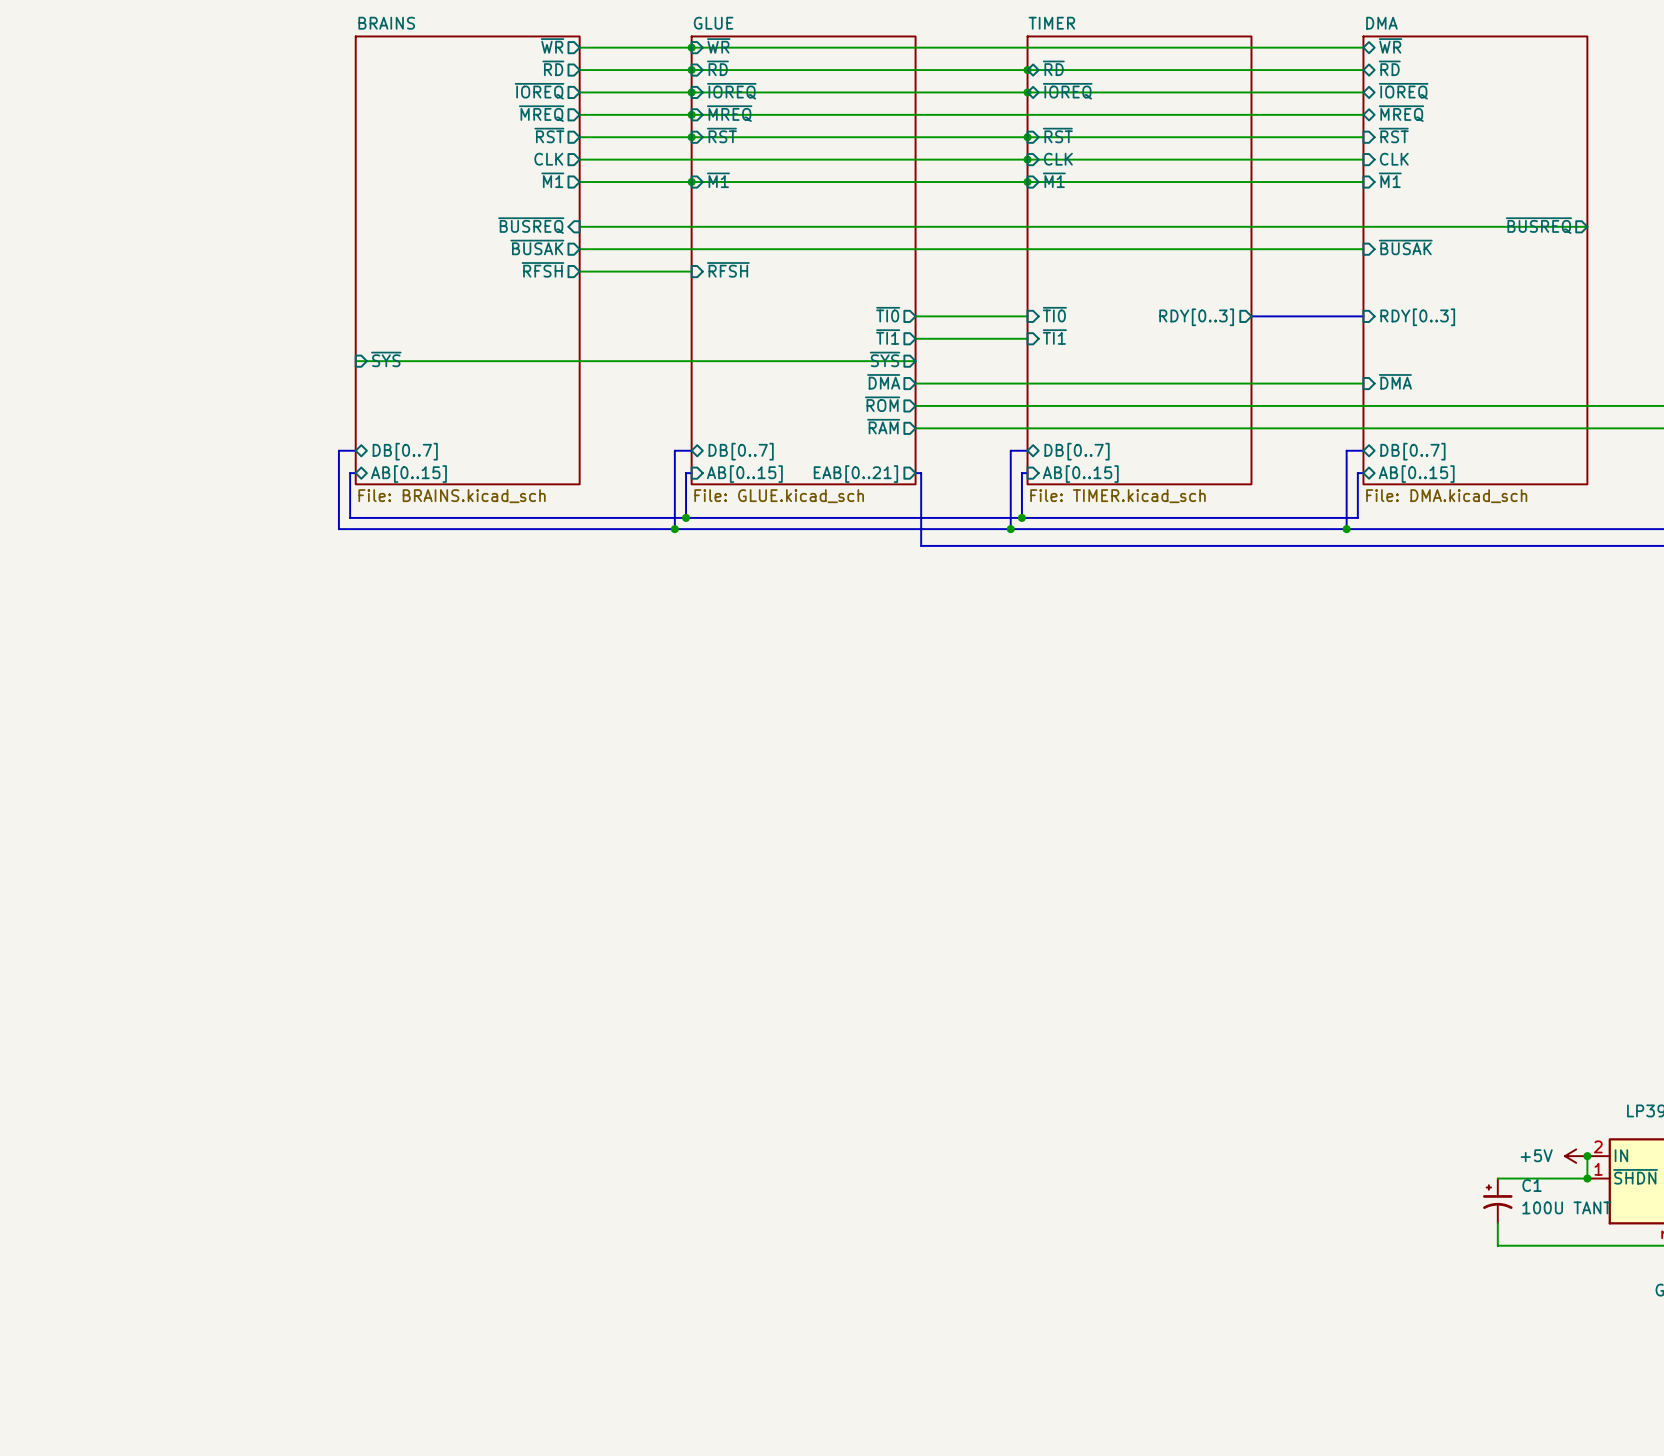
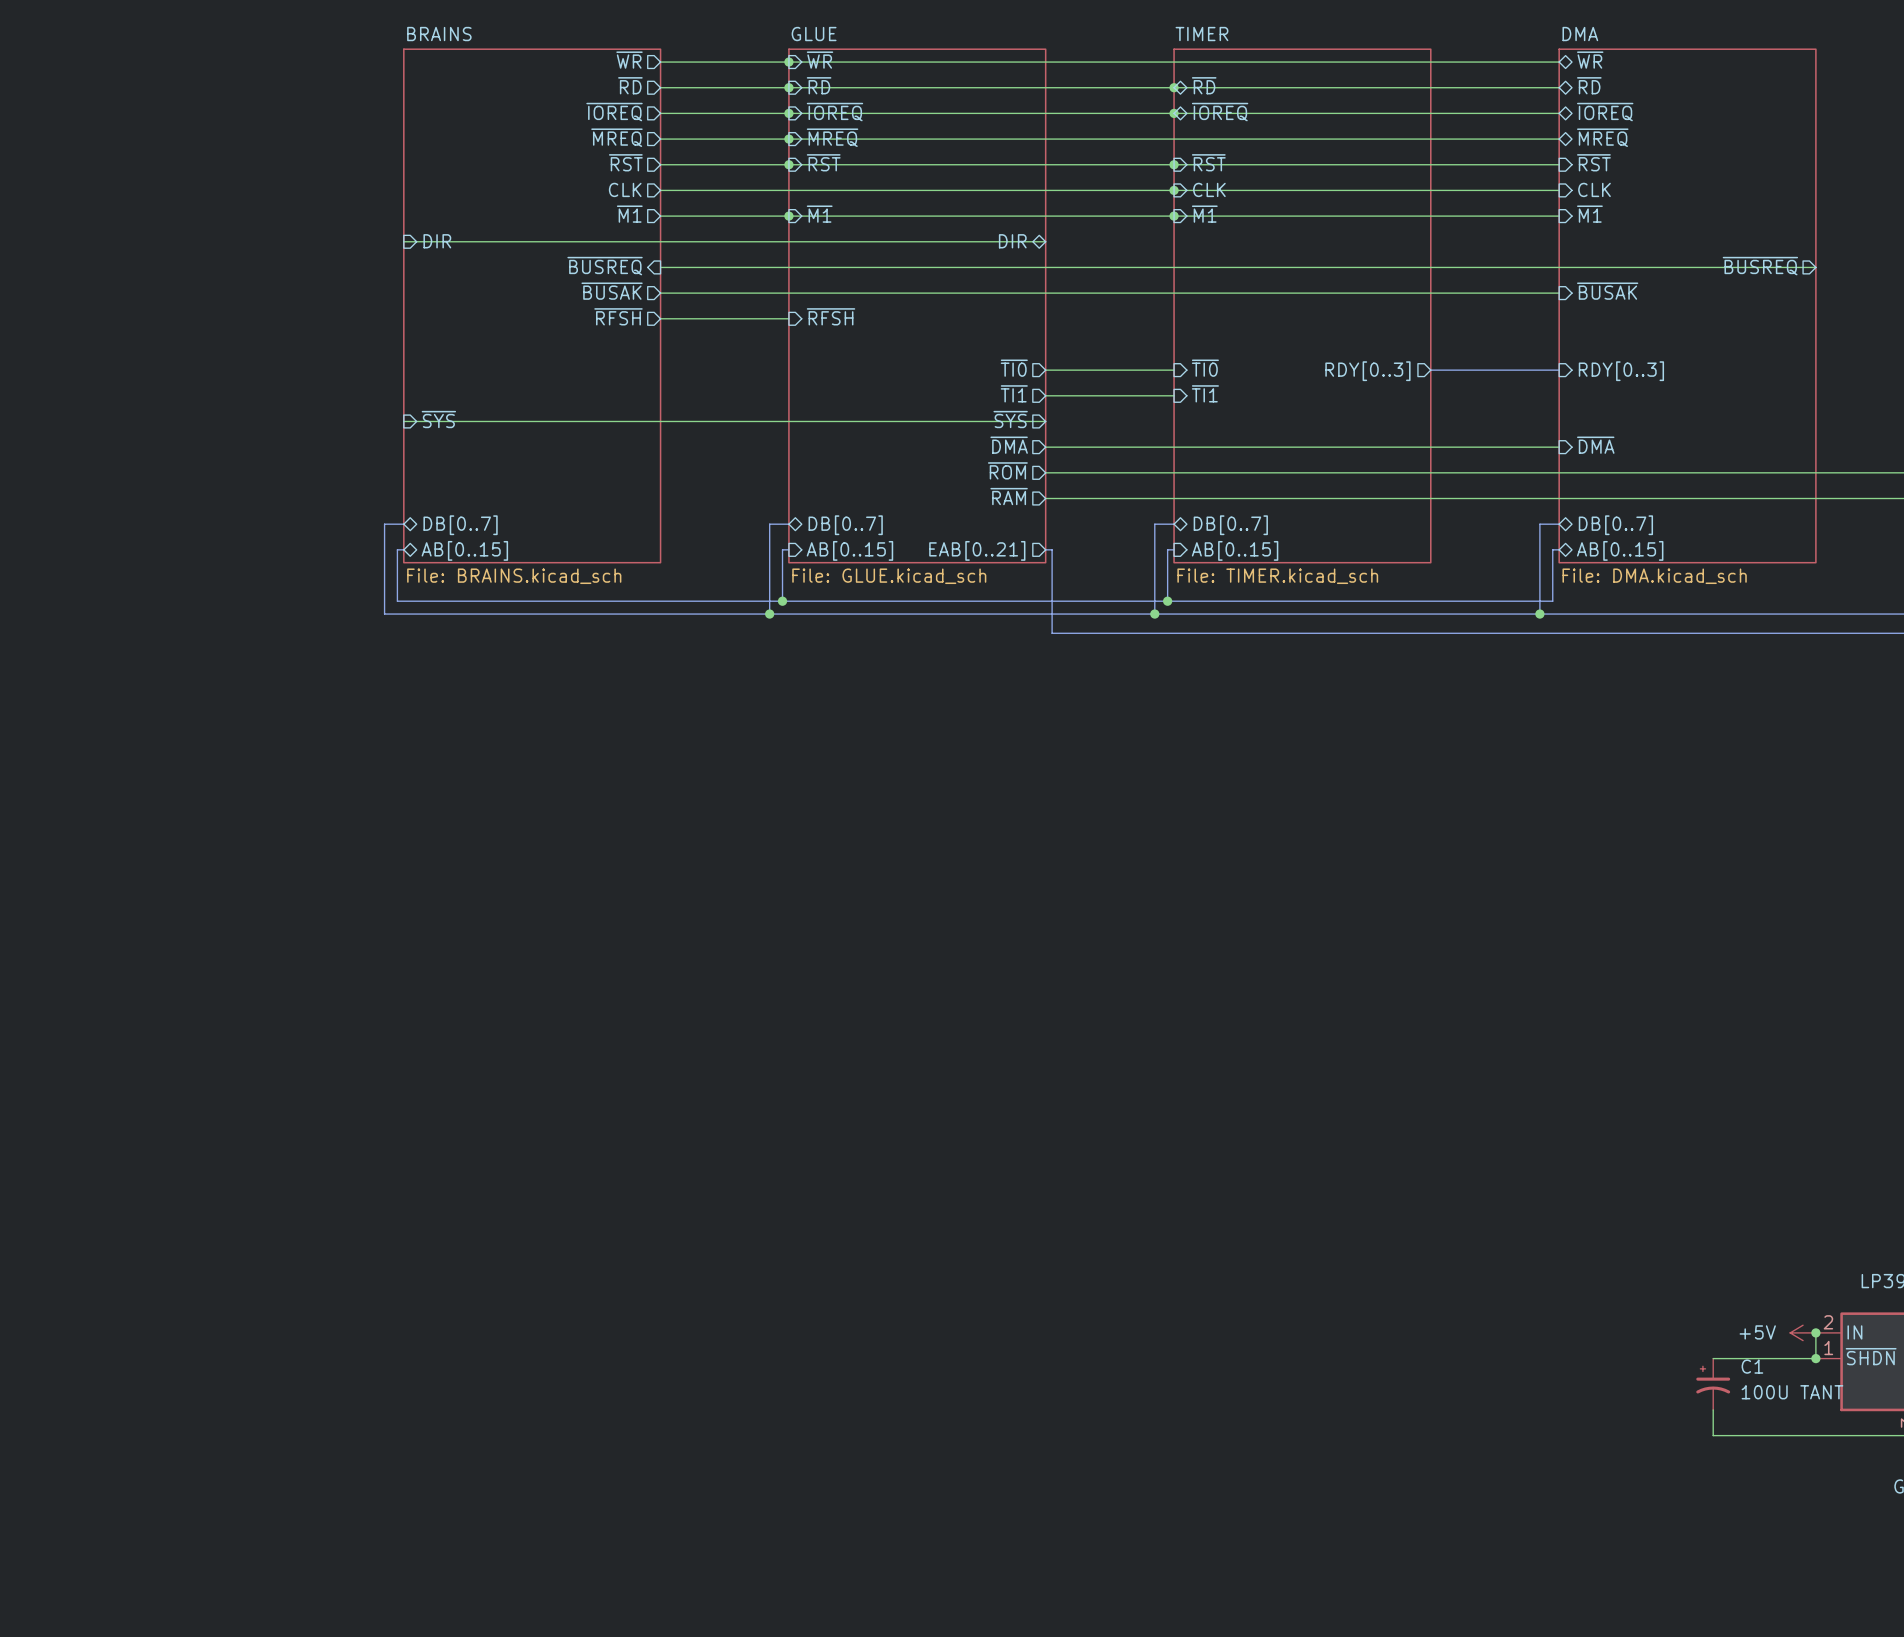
sheet pin: none -> DIR (437, 241)
sheet pin: none -> DIR (1012, 241)
wire: none -> (403, 241) (1045, 241)

